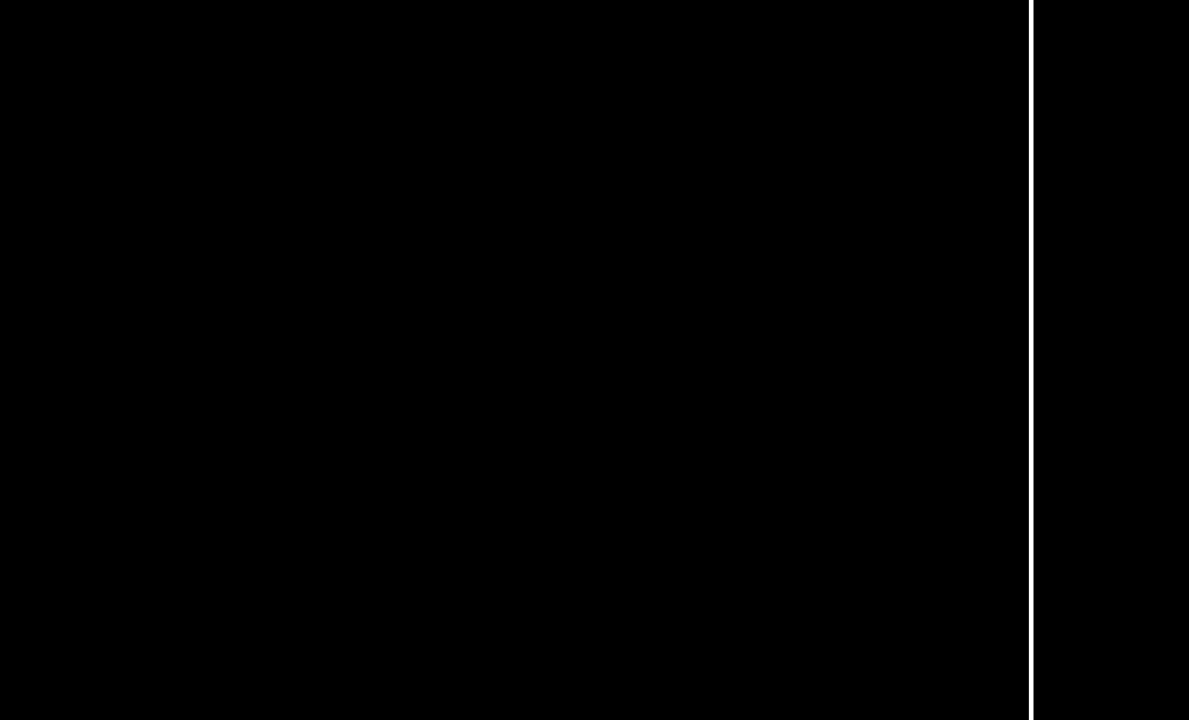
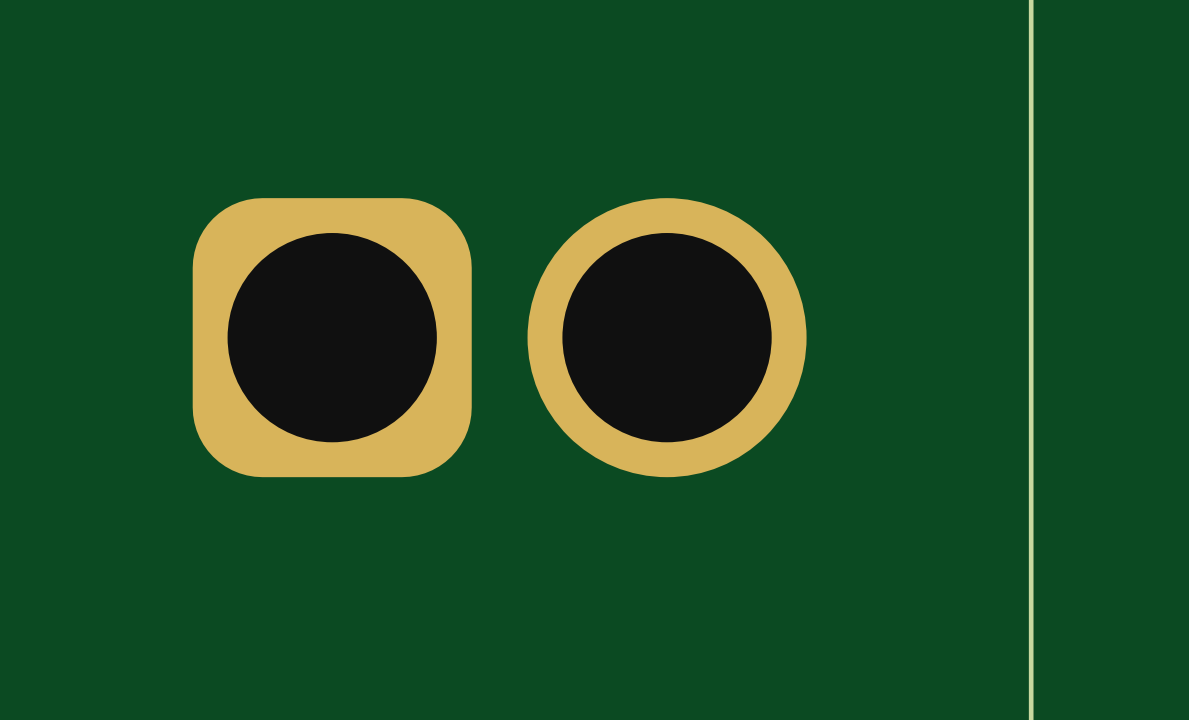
part: none -> (499, 337)

